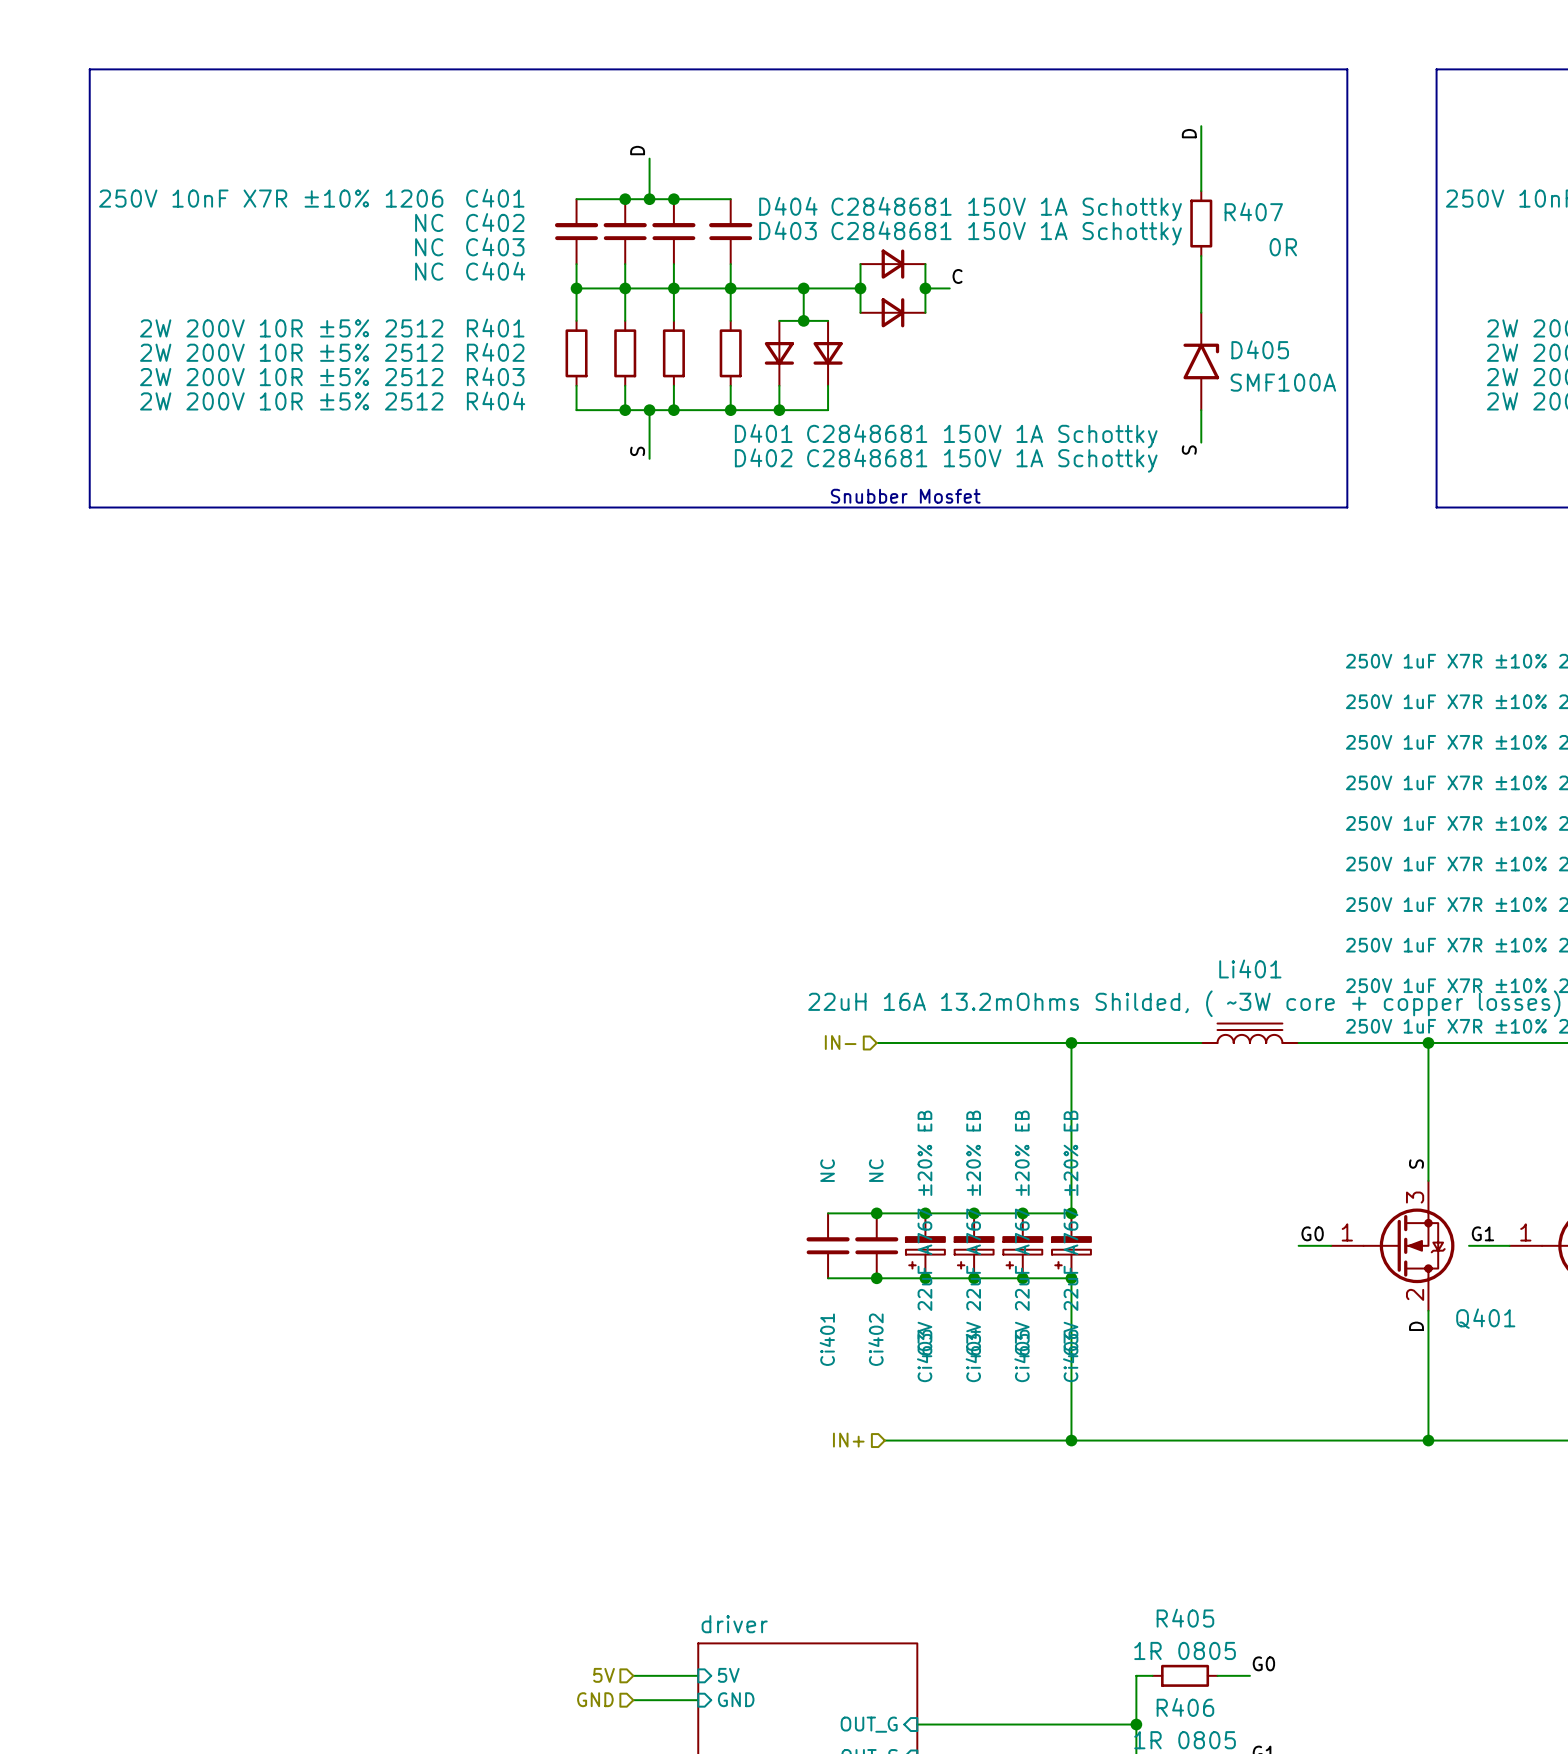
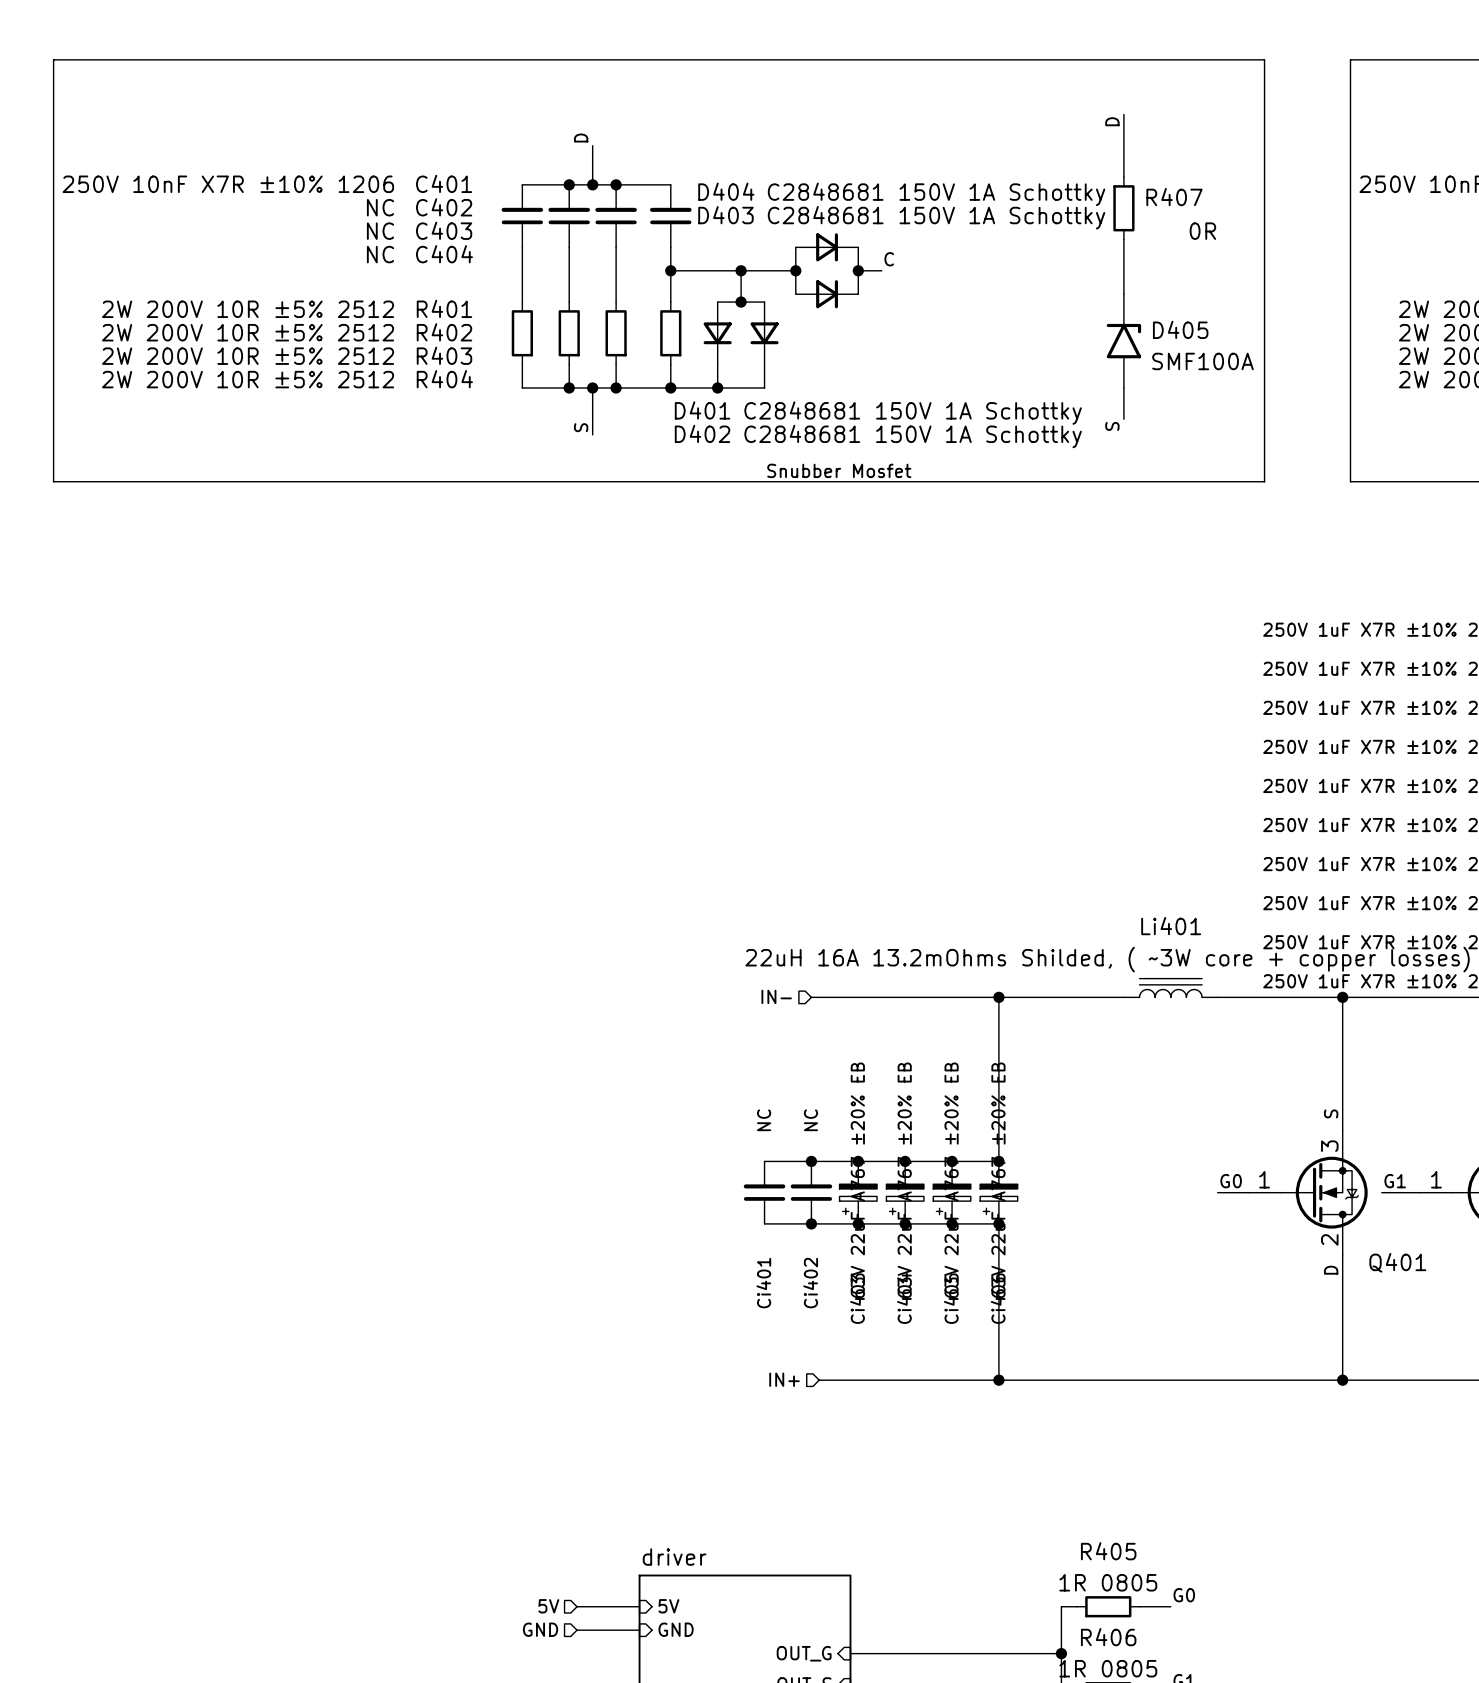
wire: (576, 288) (730, 288) -> none
junction: (576, 288) -> none
junction: (625, 288) -> none
junction: (673, 288) -> none

